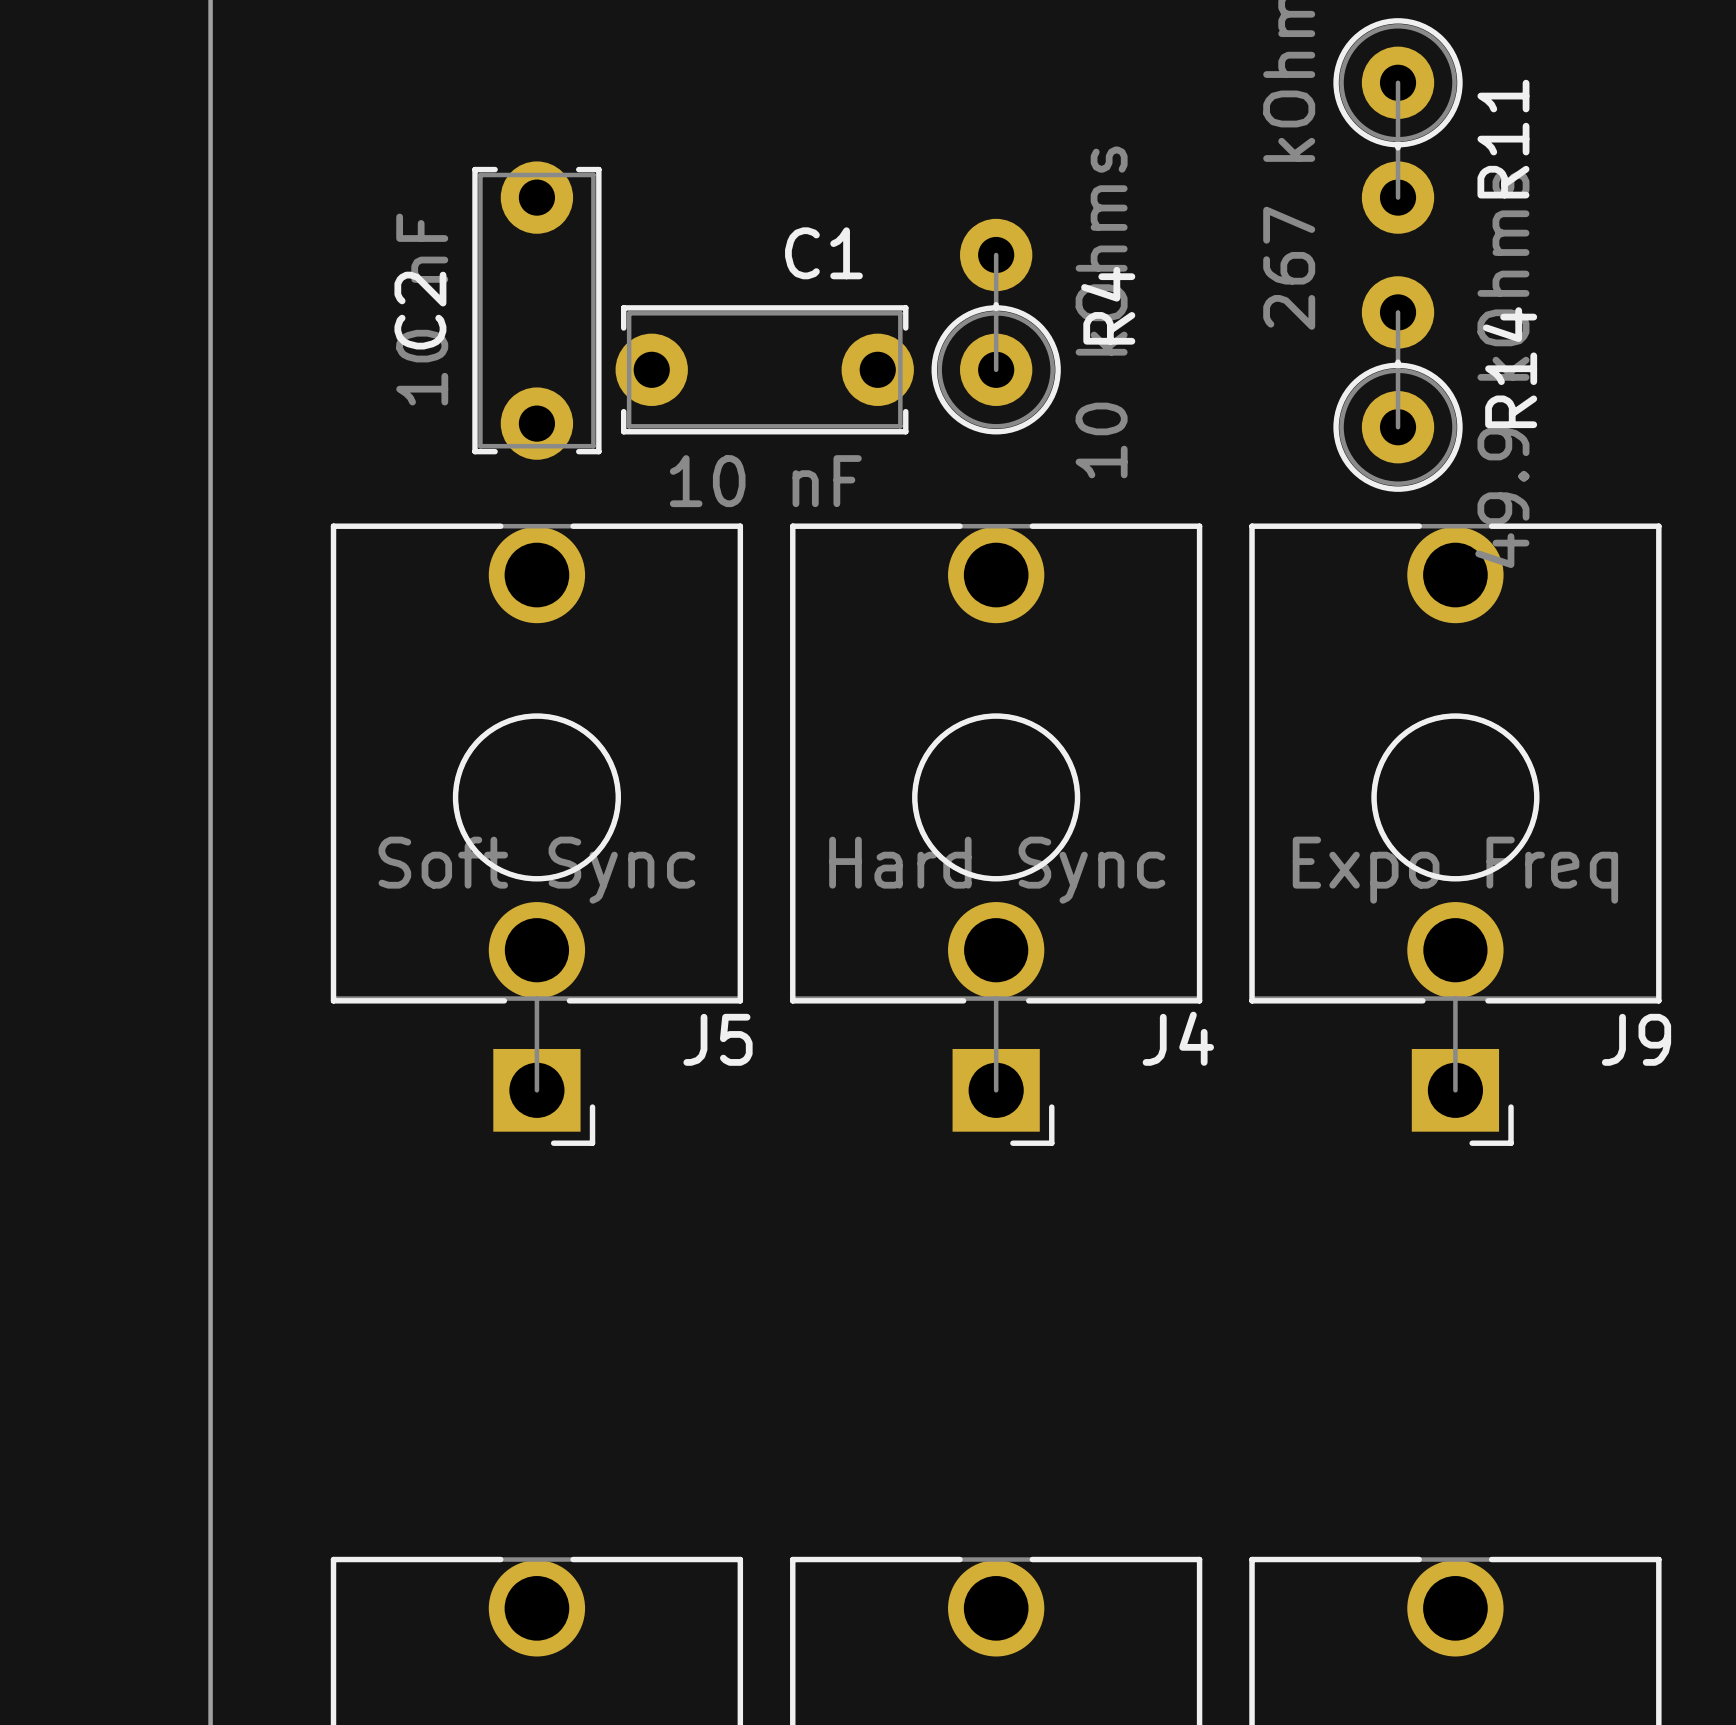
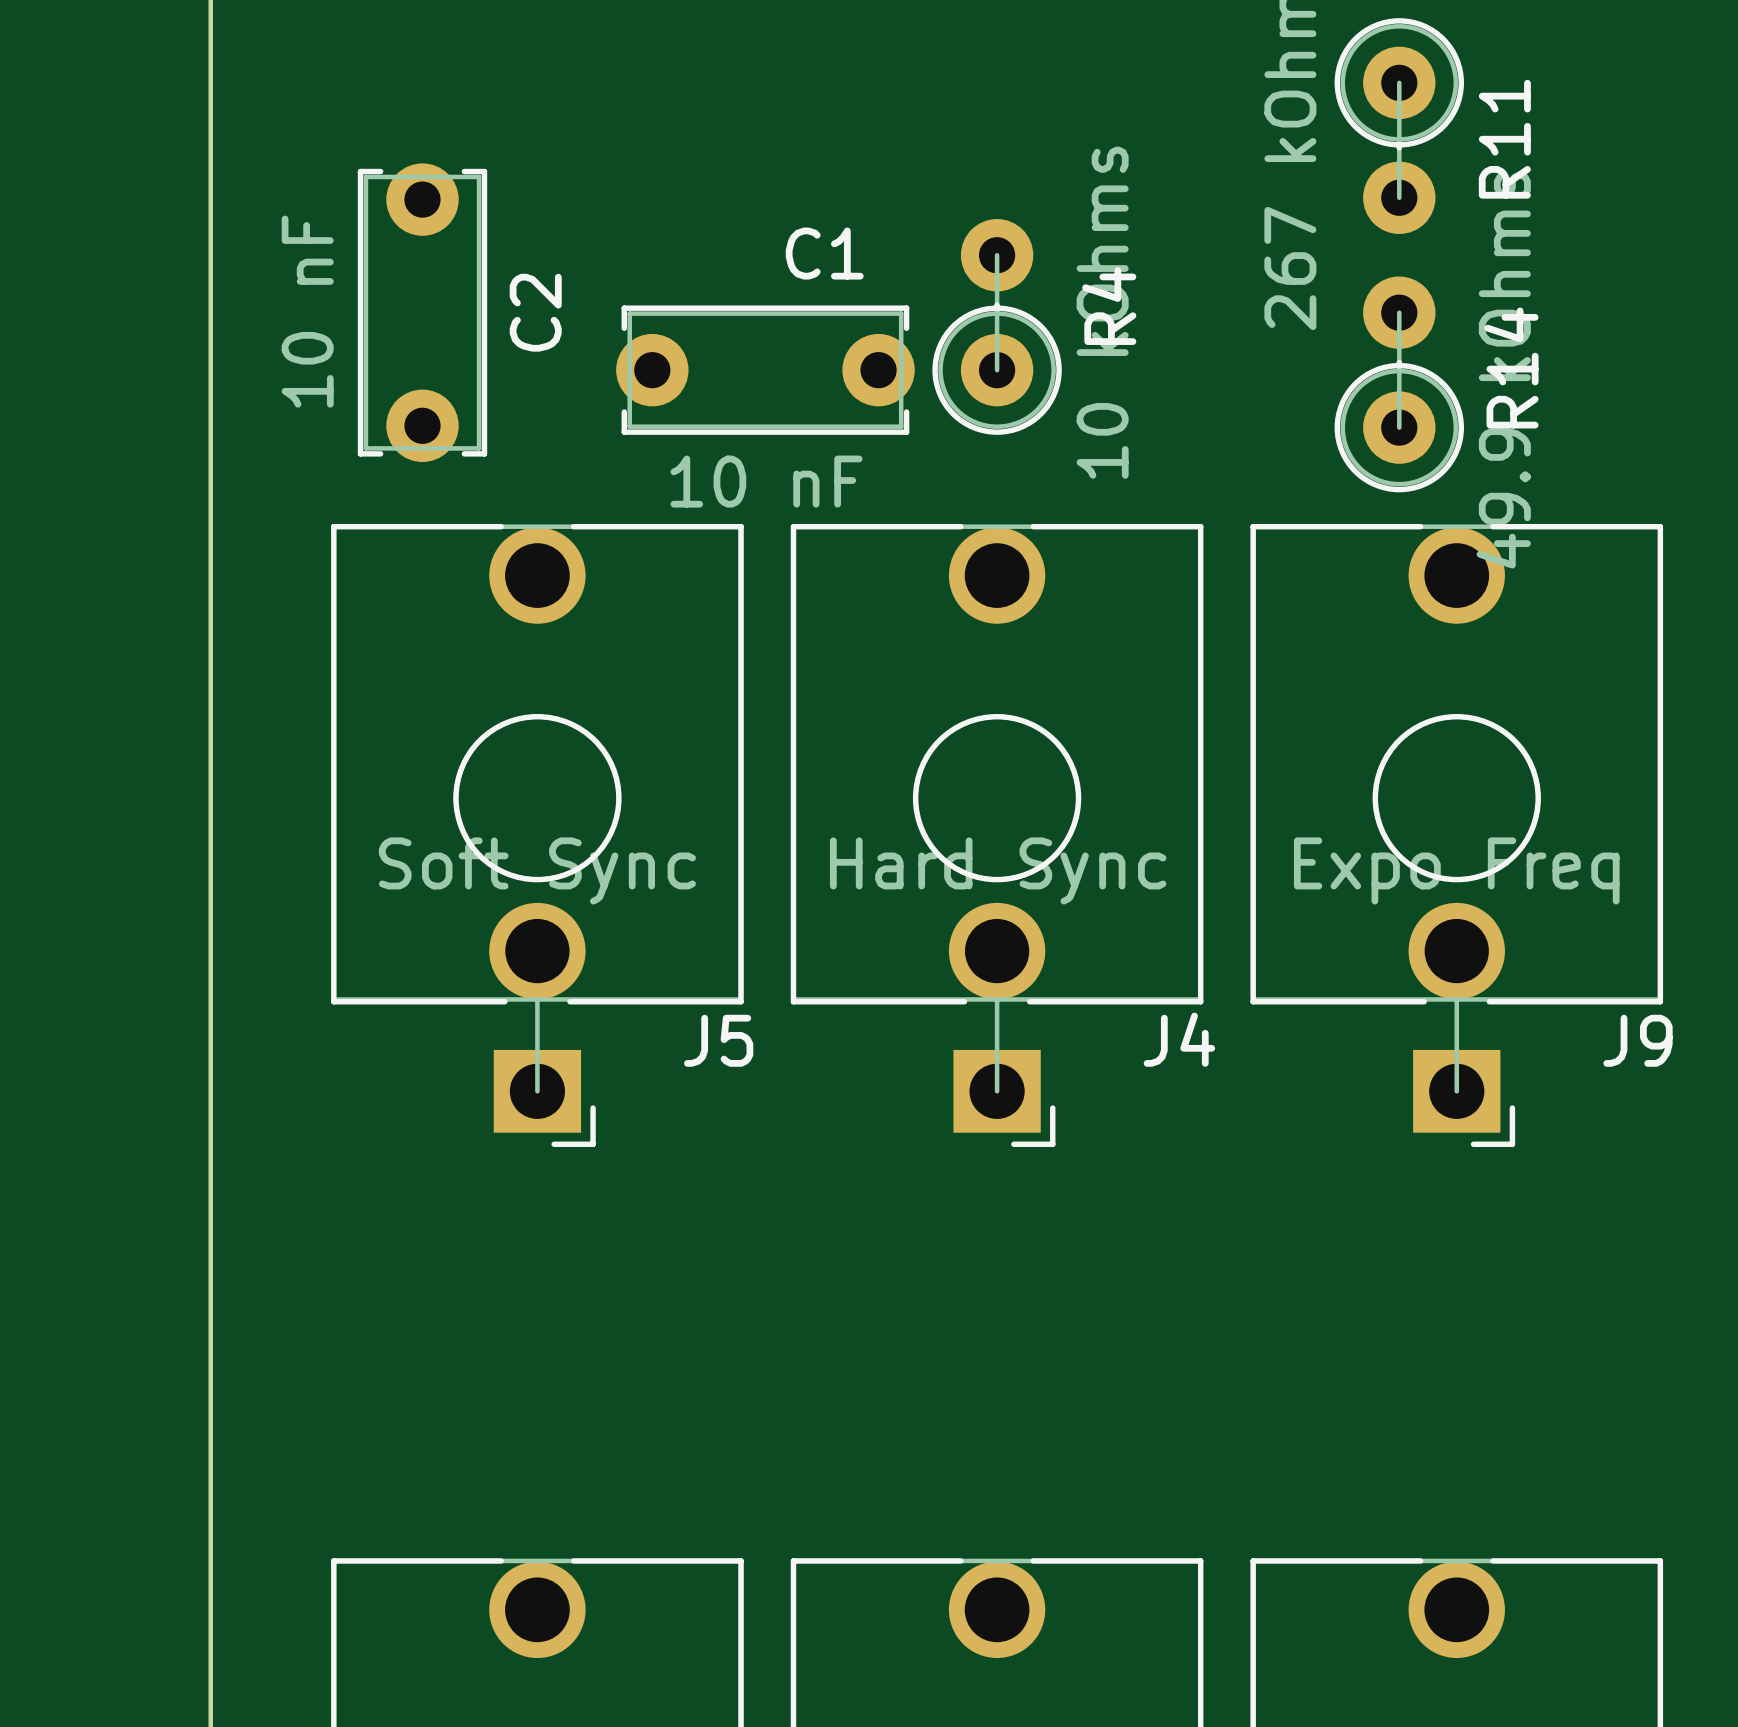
C2 name position: C2 (420, 310) -> C2 (535, 312)
C2 position: (536, 310) -> (422, 312)

